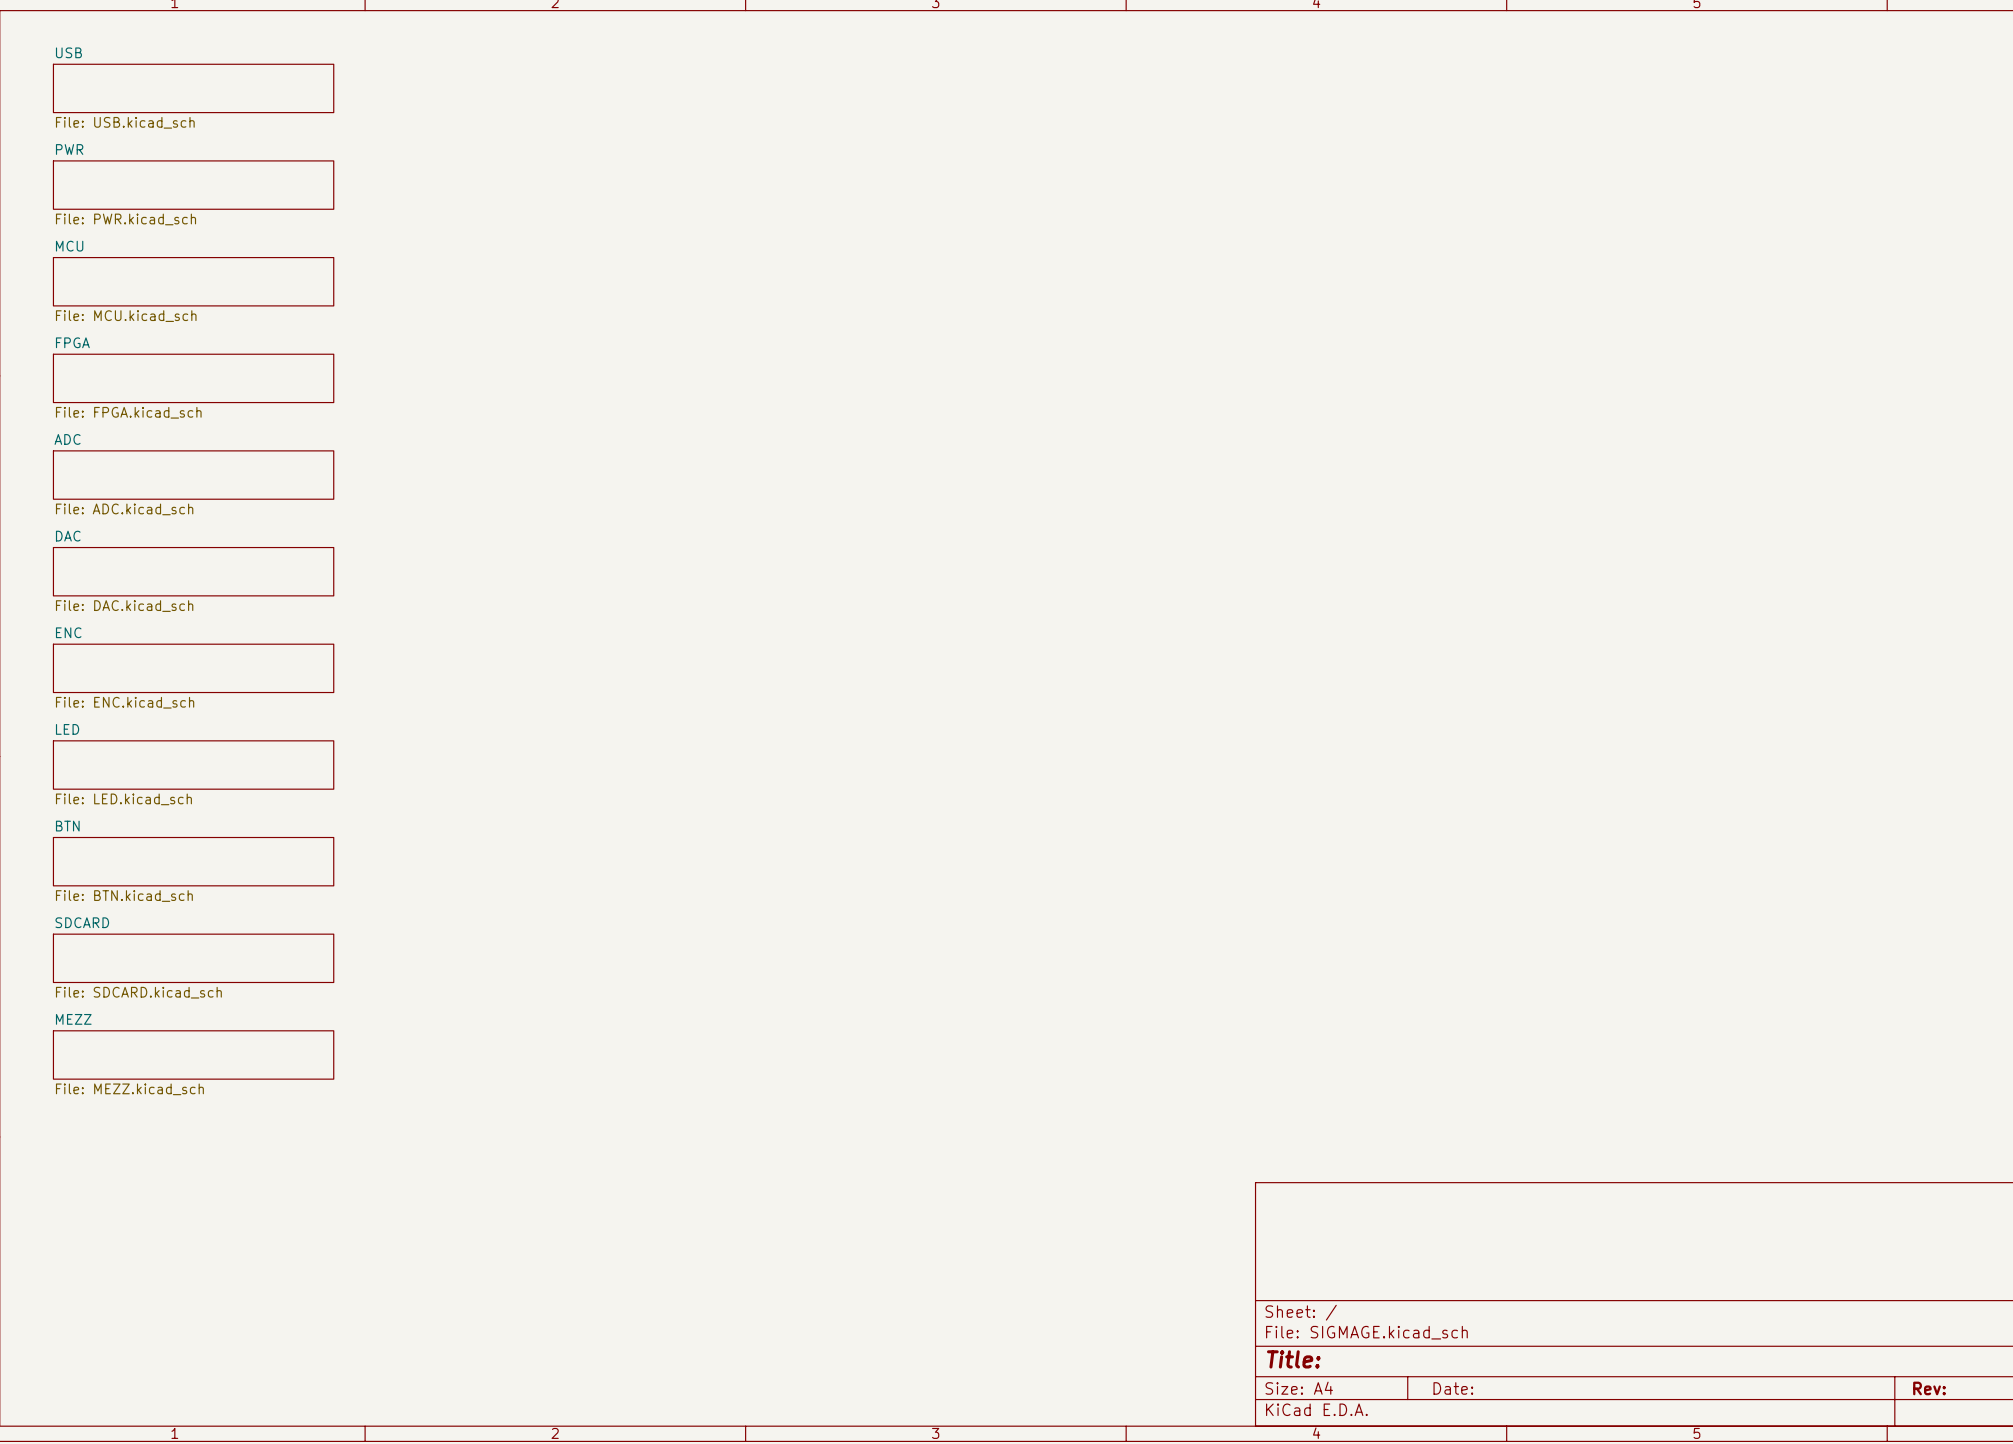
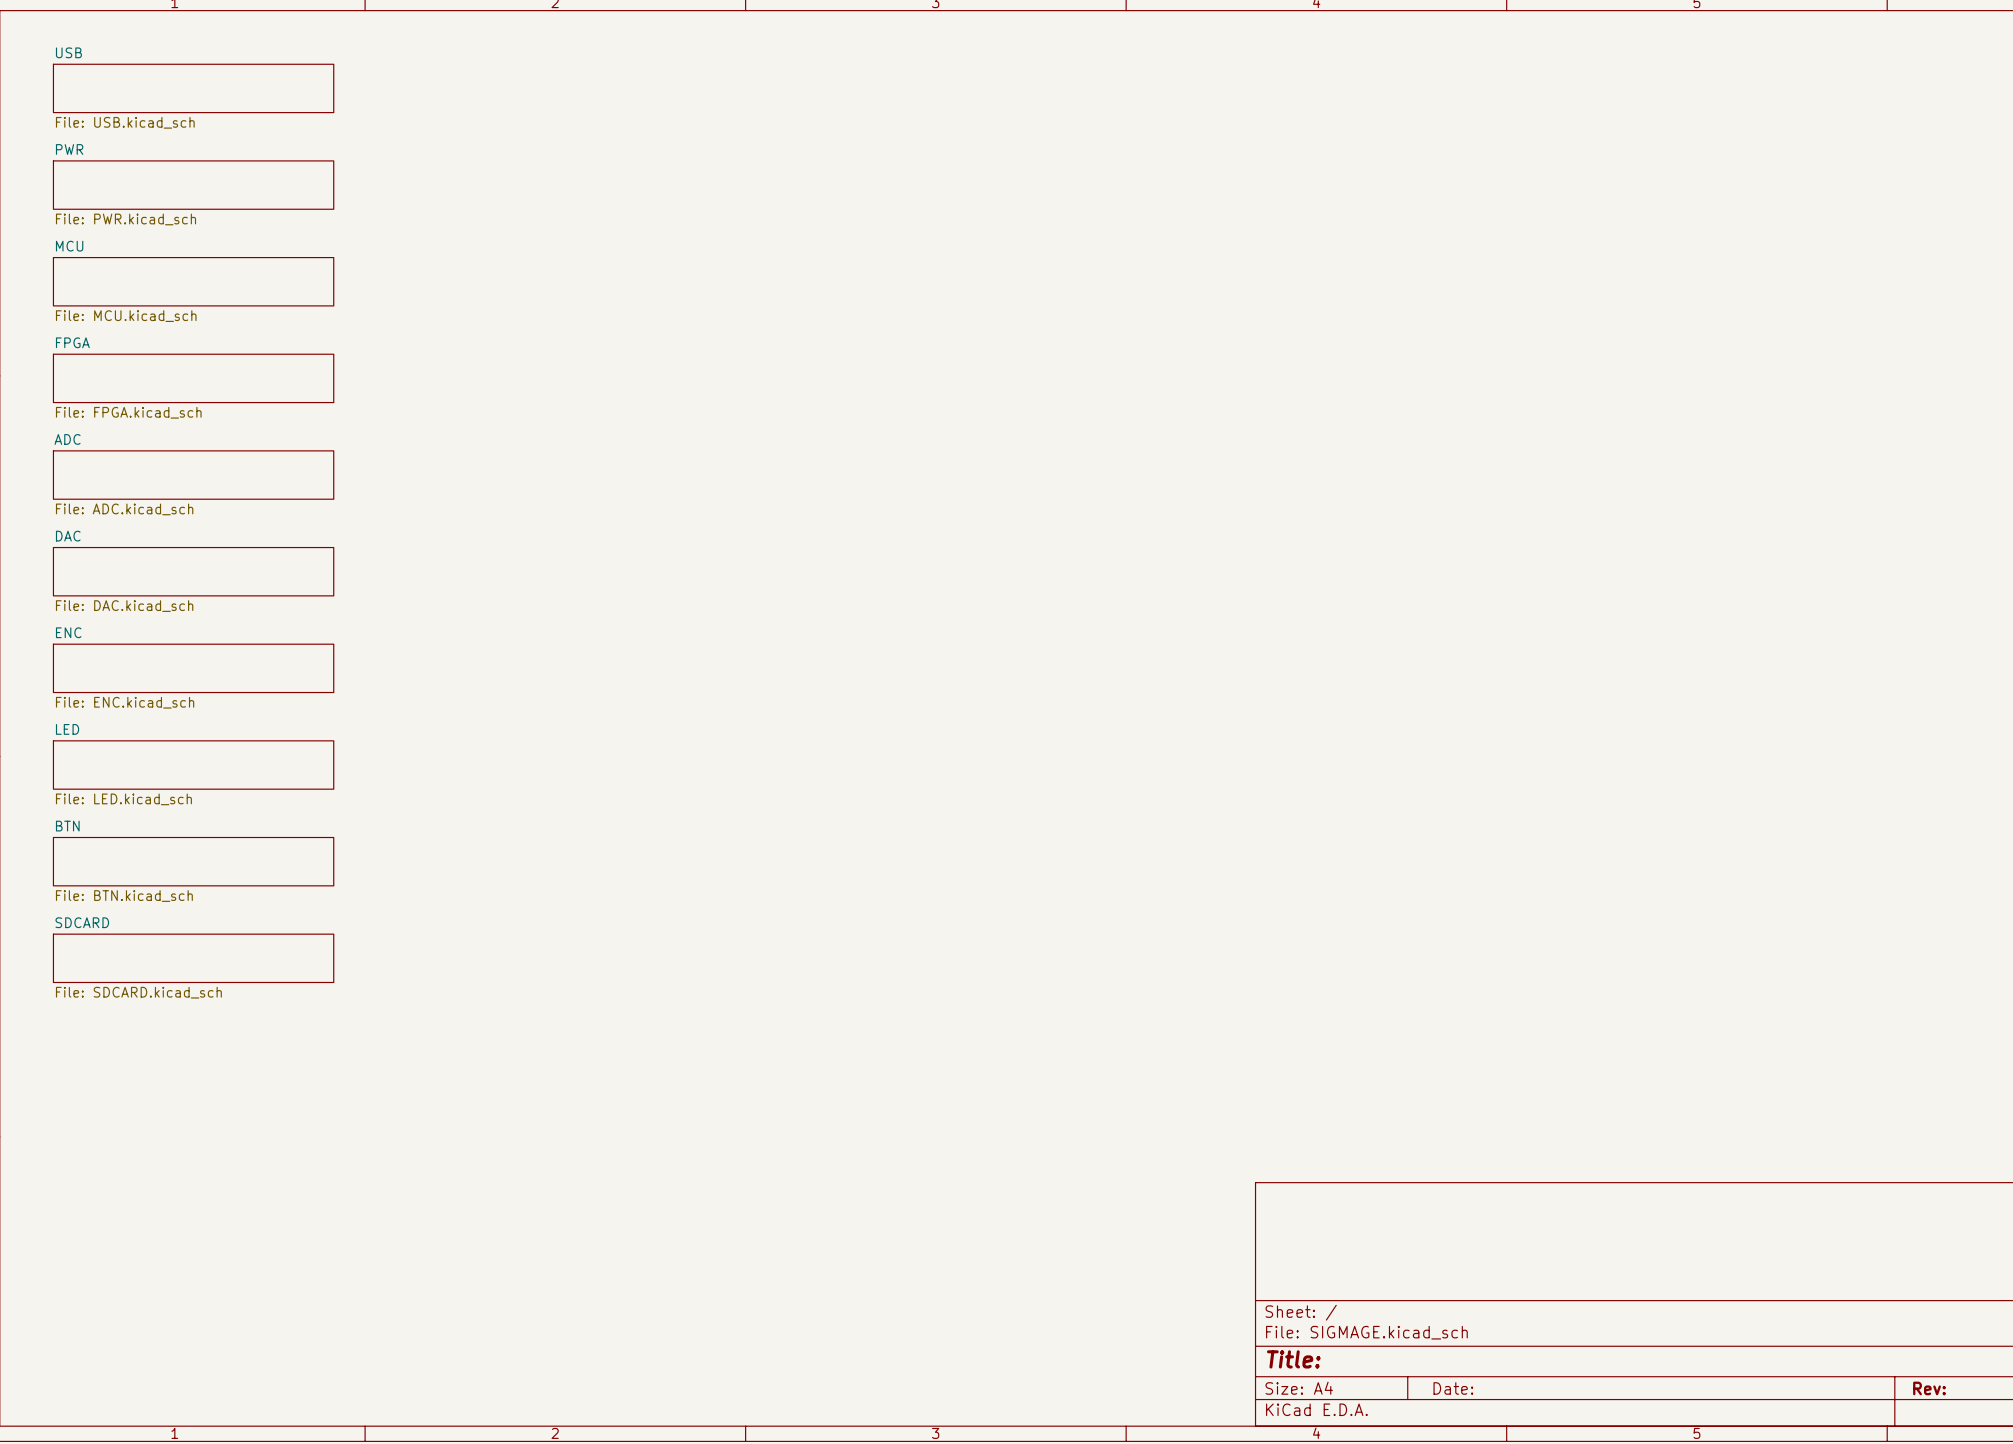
sheet MEZZ: File: MEZZ.kicad_sch (193, 1054) -> none

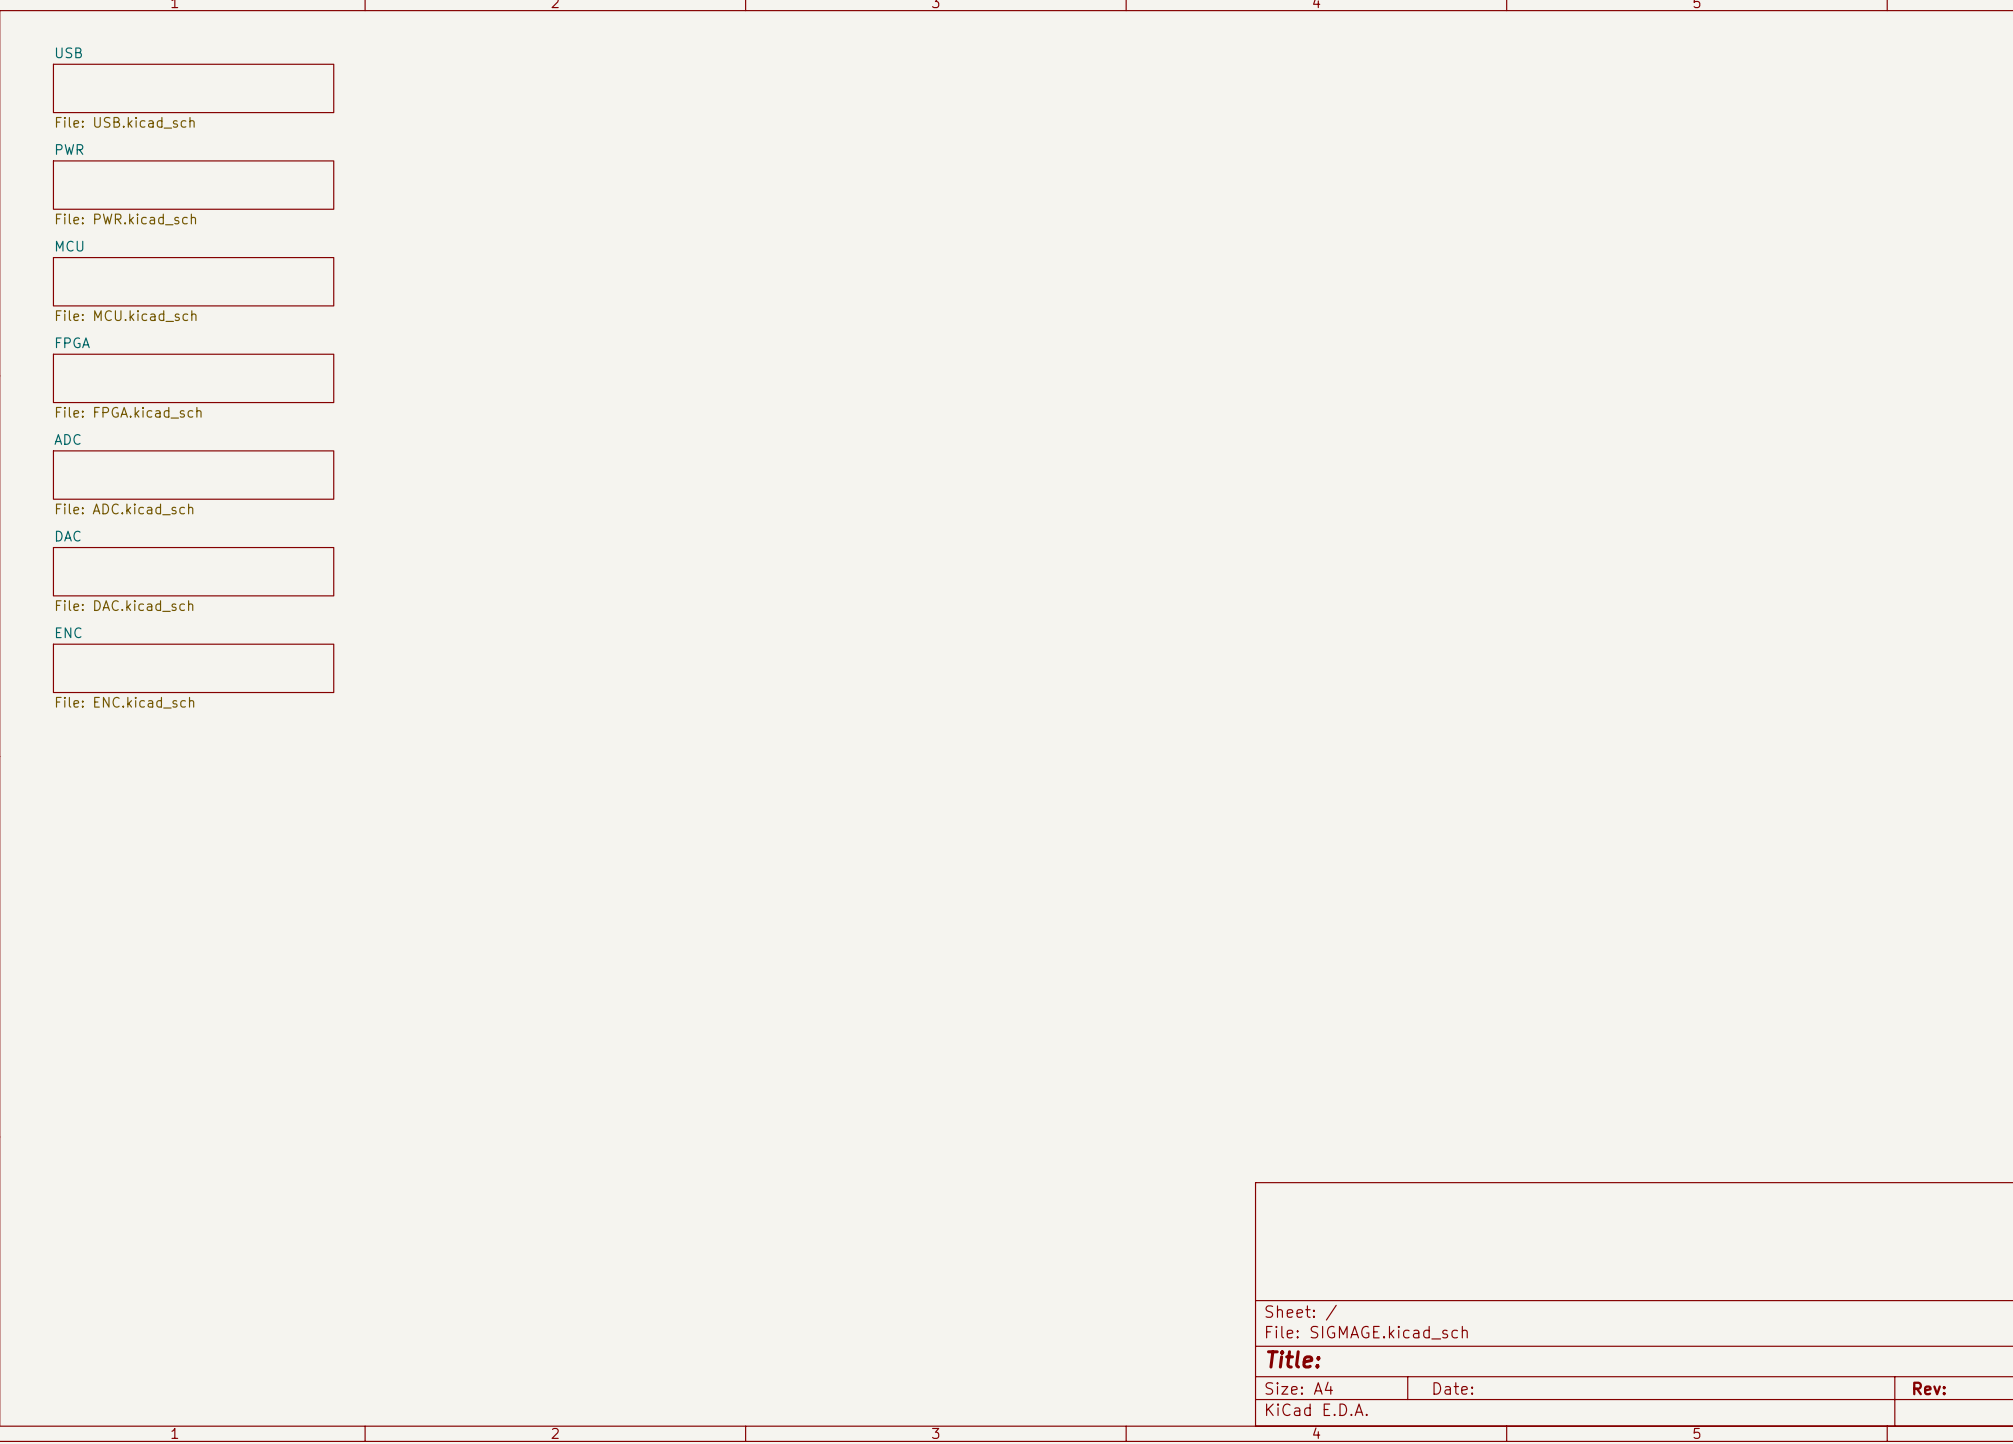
sheet LED: File: LED.kicad_sch (193, 765) -> none
sheet BTN: File: BTN.kicad_sch (193, 861) -> none
sheet SDCARD: File: SDCARD.kicad_sch (193, 958) -> none

